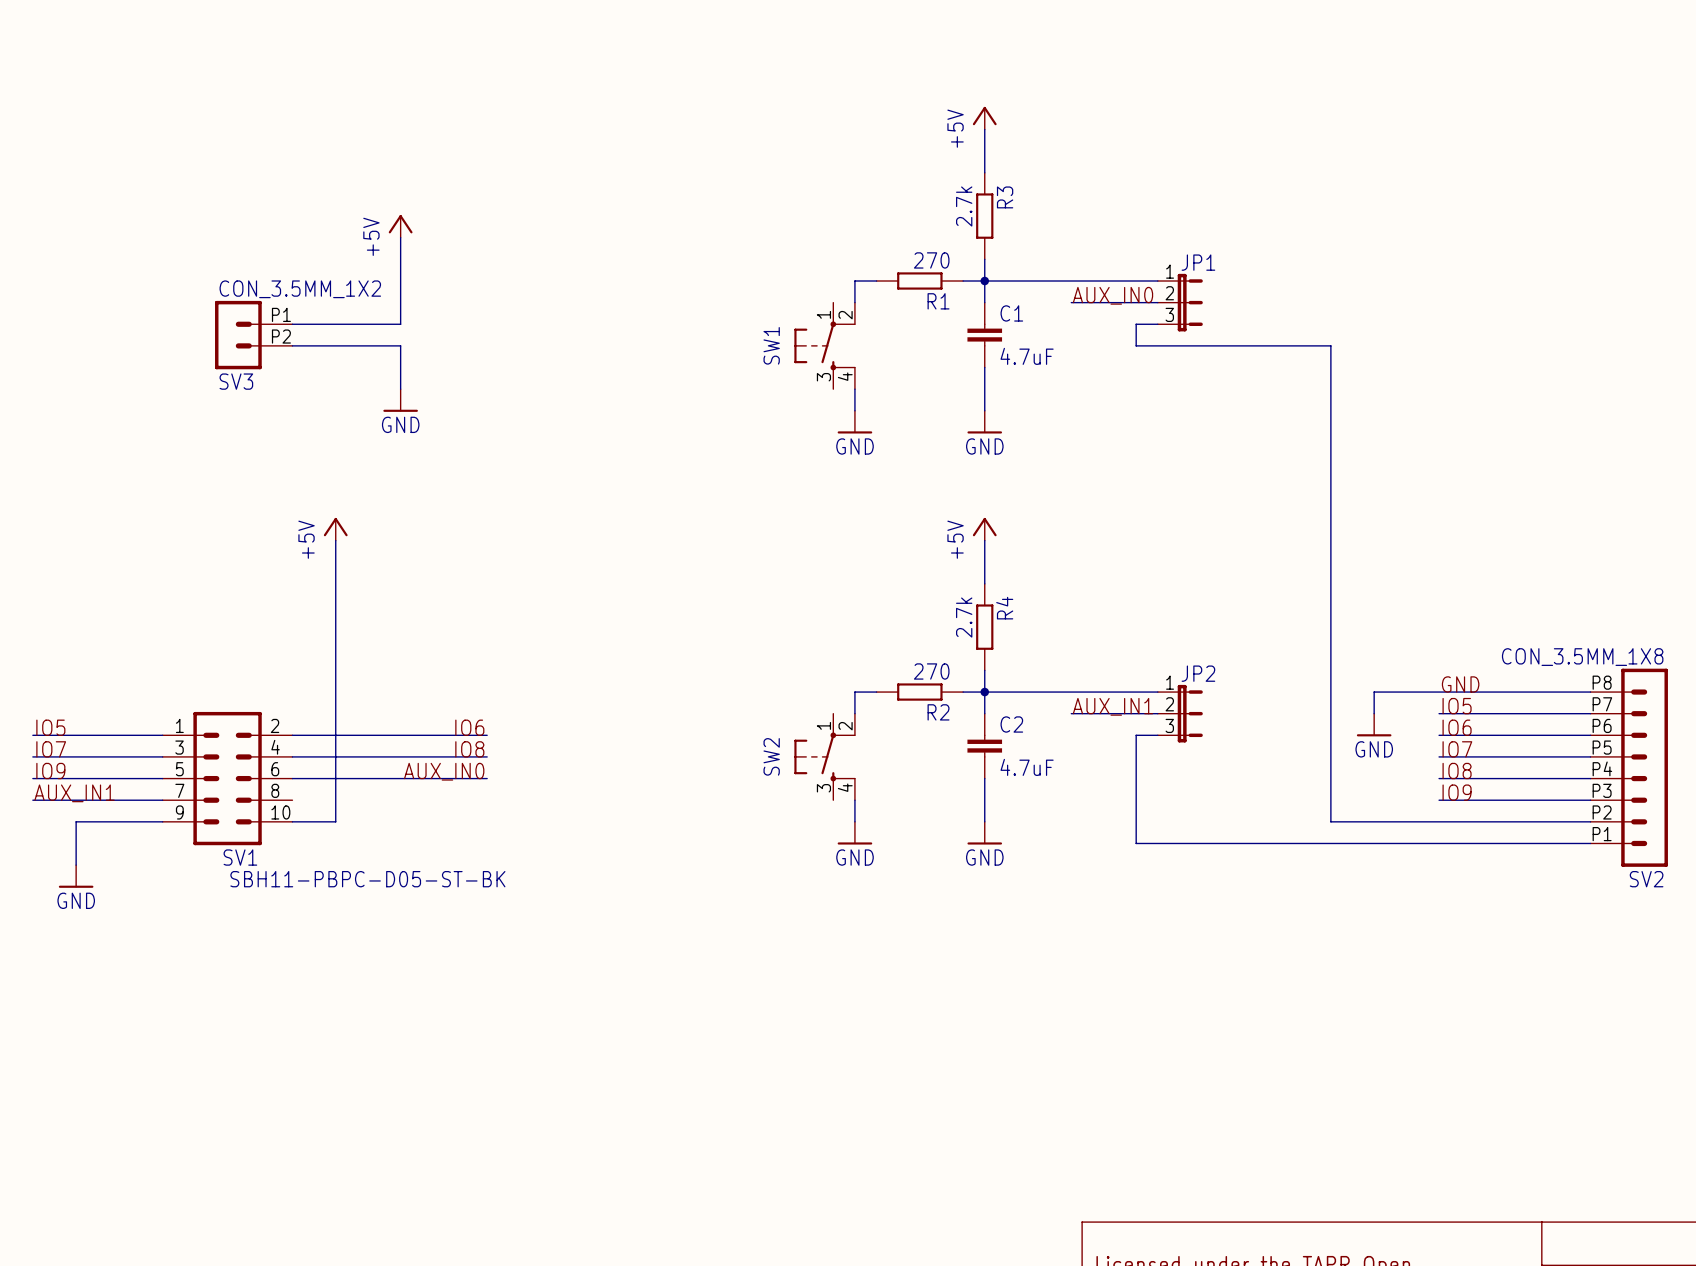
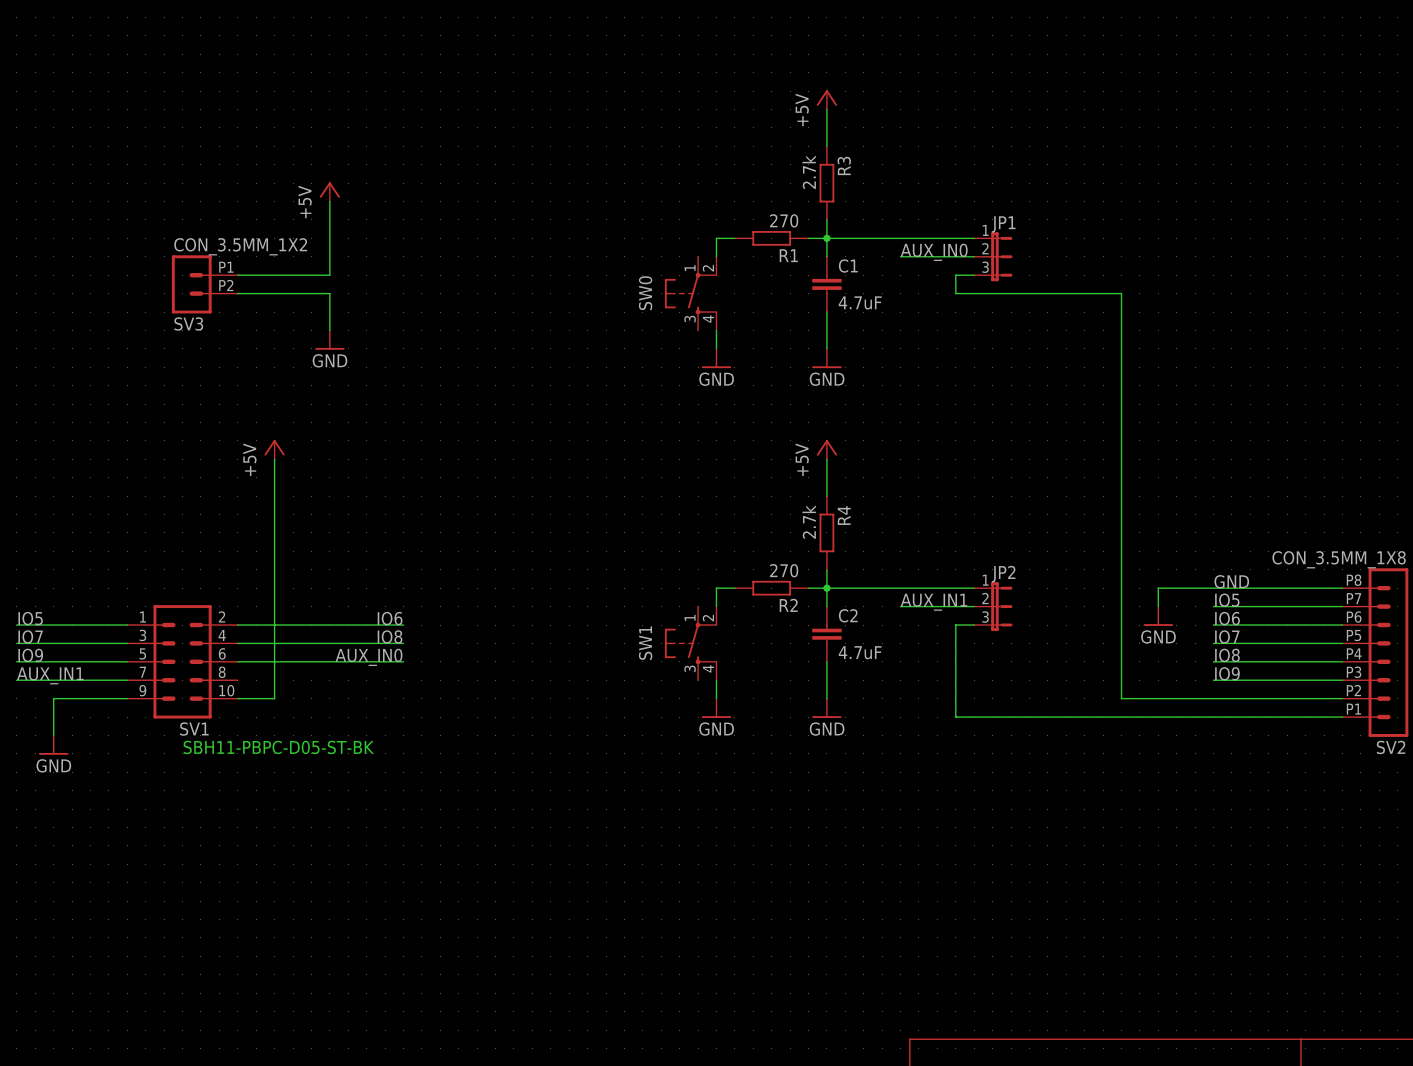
SW1 name: SW1 (771, 345) -> SW0 (645, 293)
SW2 name: SW2 (771, 756) -> SW1 (645, 643)

